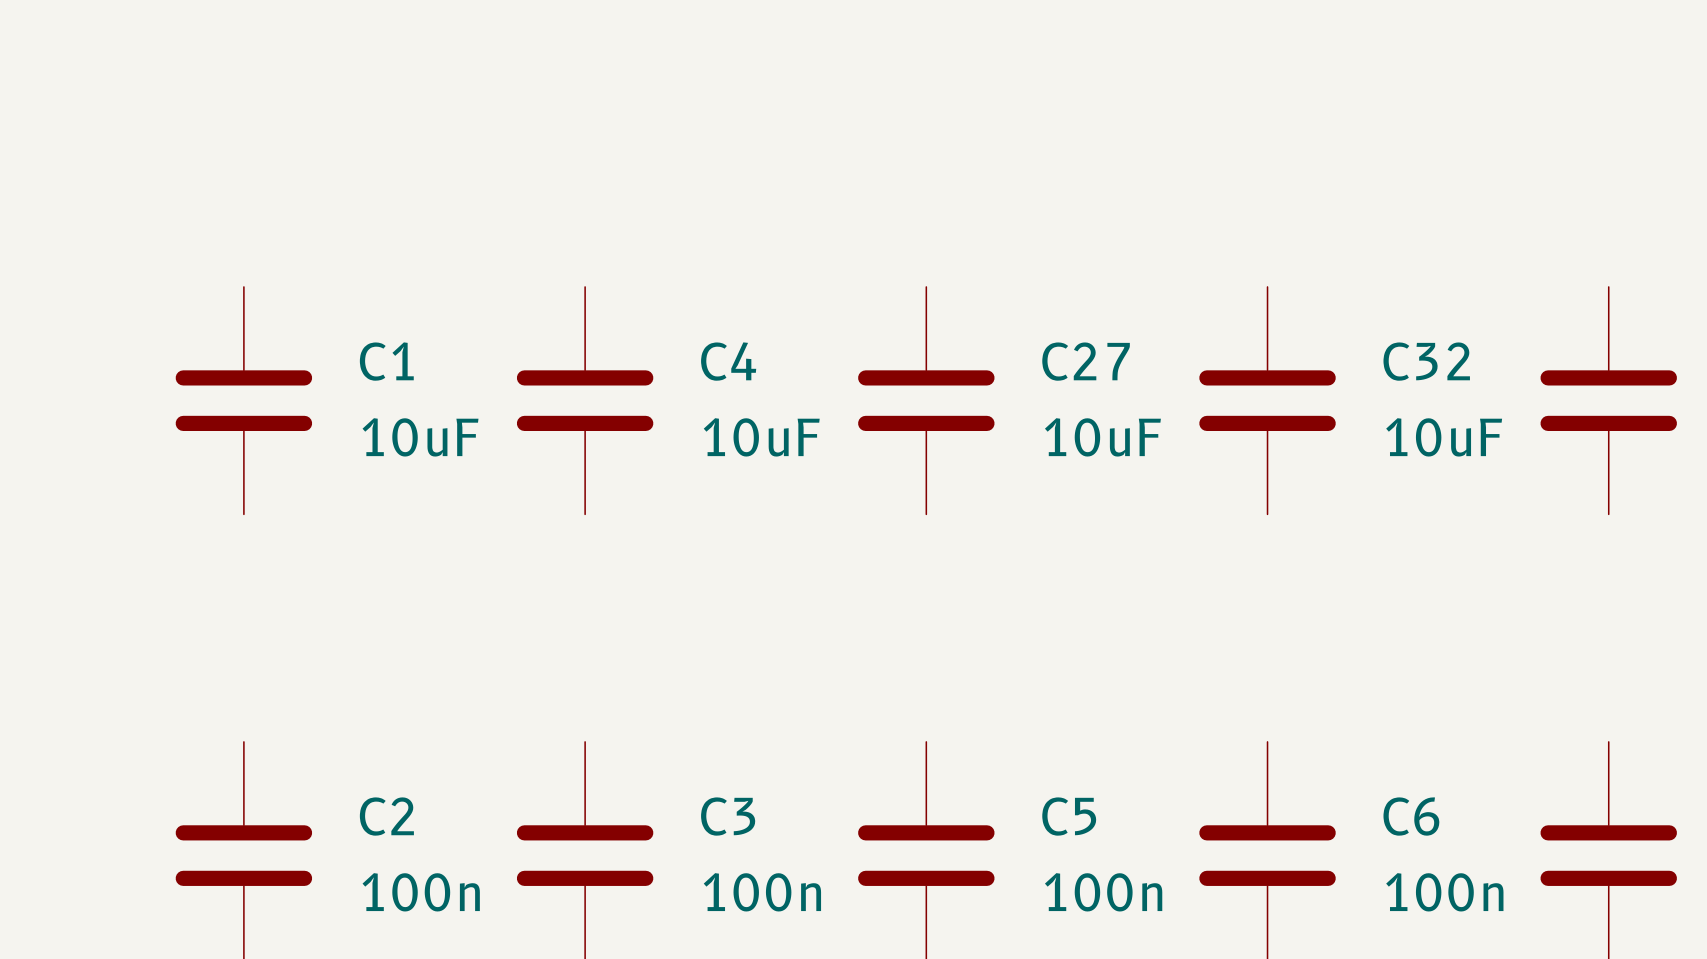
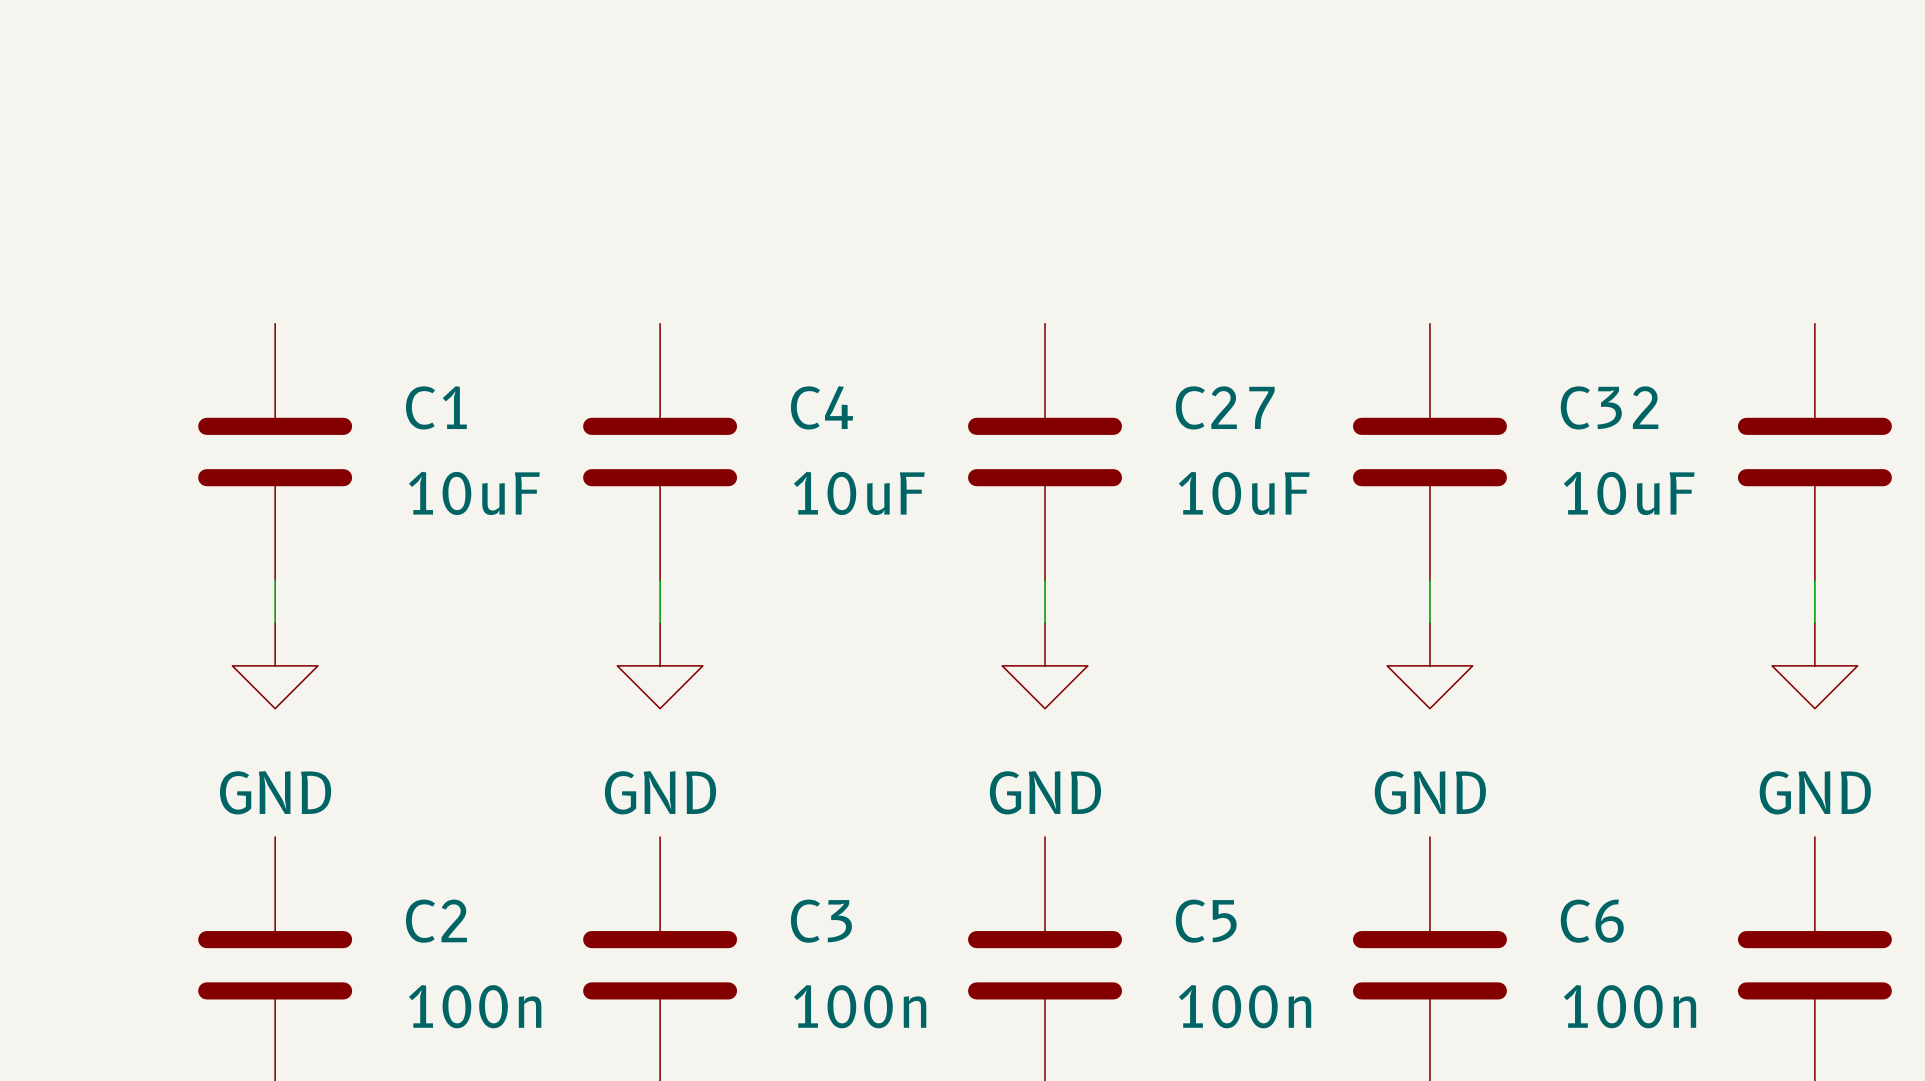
wire: none -> (275, 580) (275, 623)
wire: none -> (660, 580) (660, 623)
wire: none -> (1045, 580) (1045, 623)
wire: none -> (1429, 580) (1429, 623)
wire: none -> (1814, 580) (1814, 623)
power symbol: none -> GND (275, 665)
power symbol: none -> GND (660, 665)
power symbol: none -> GND (1045, 665)
power symbol: none -> GND (1429, 665)
power symbol: none -> GND (1814, 665)

